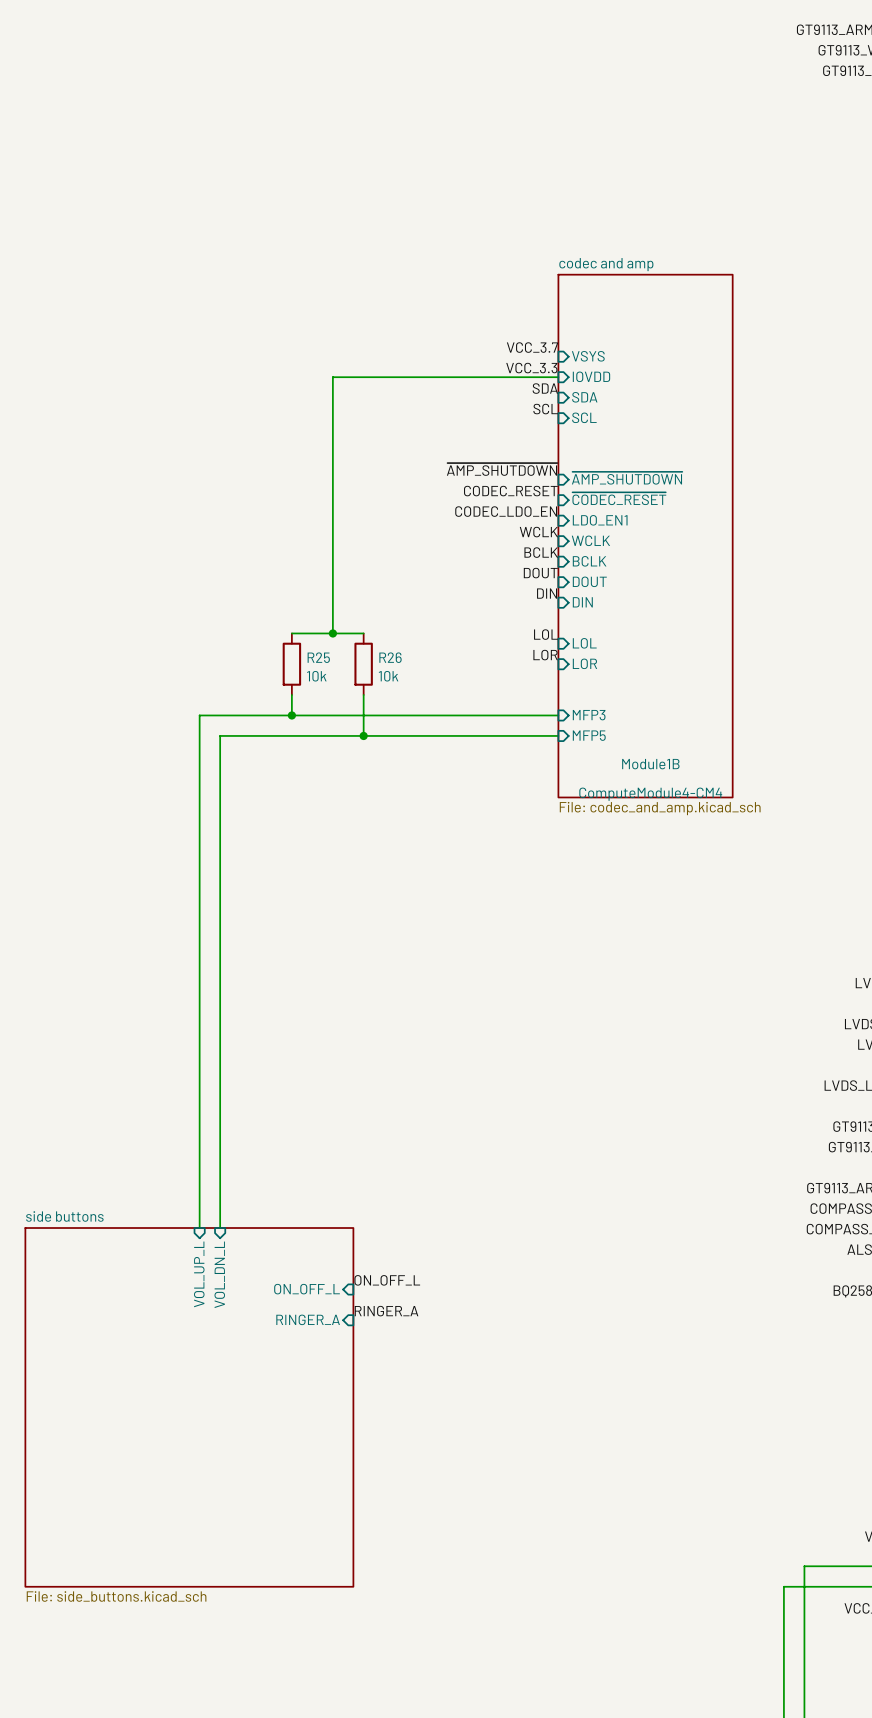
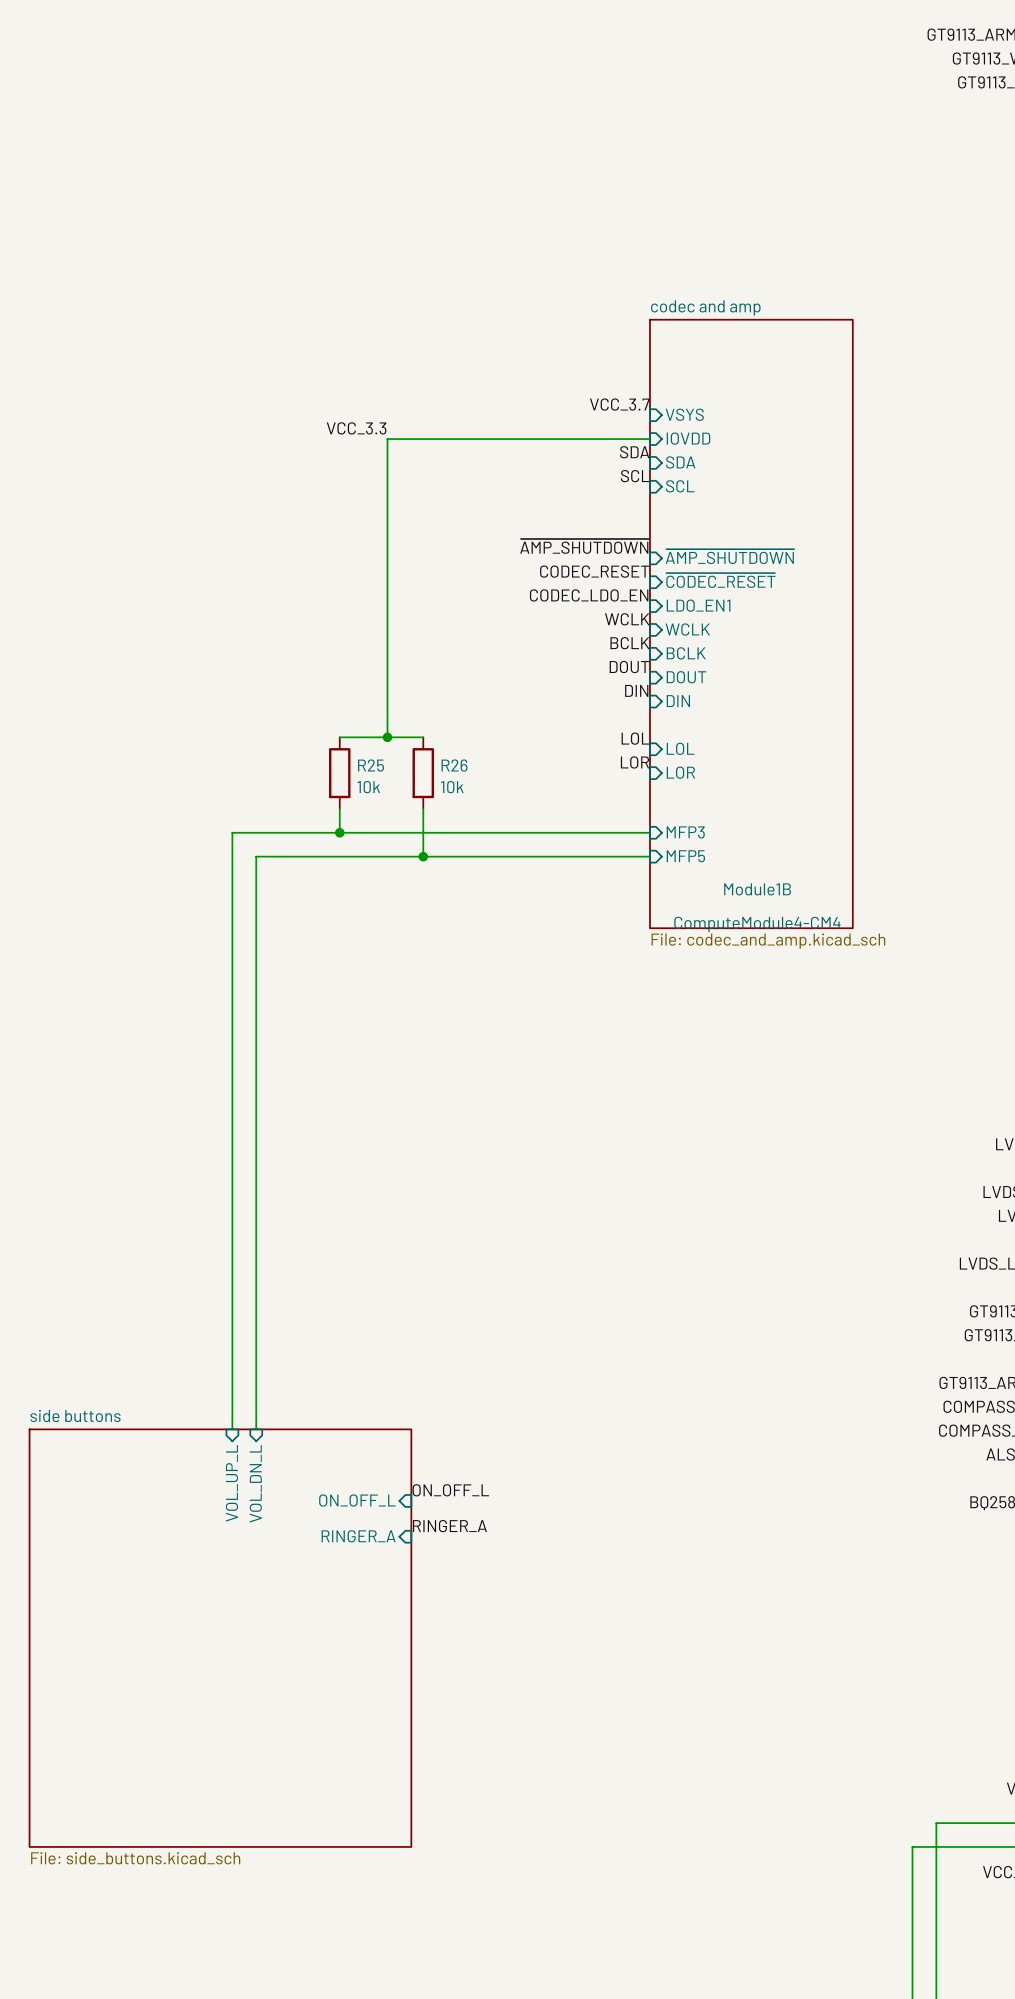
label: none -> VCC_3.3 (356, 428)
label: VCC_3.3 (531, 368) -> none

